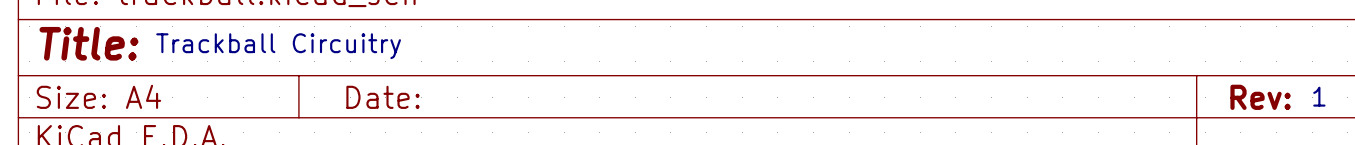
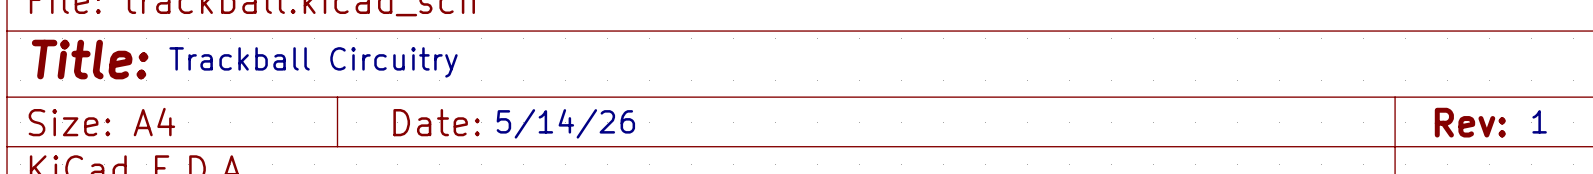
text: none -> 5/14/26 (565, 123)

